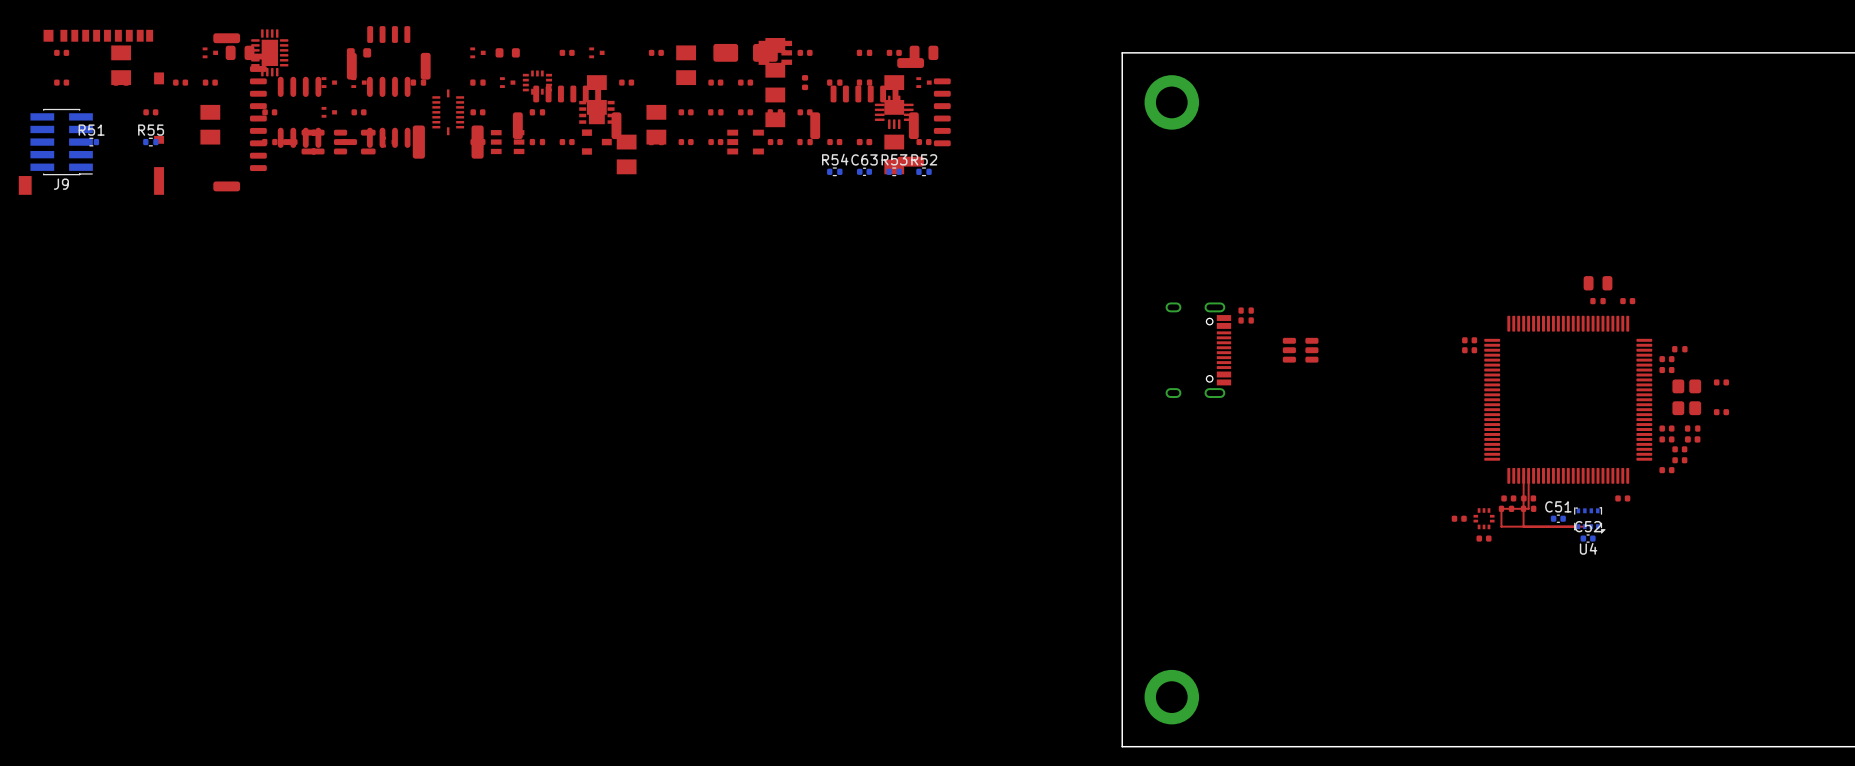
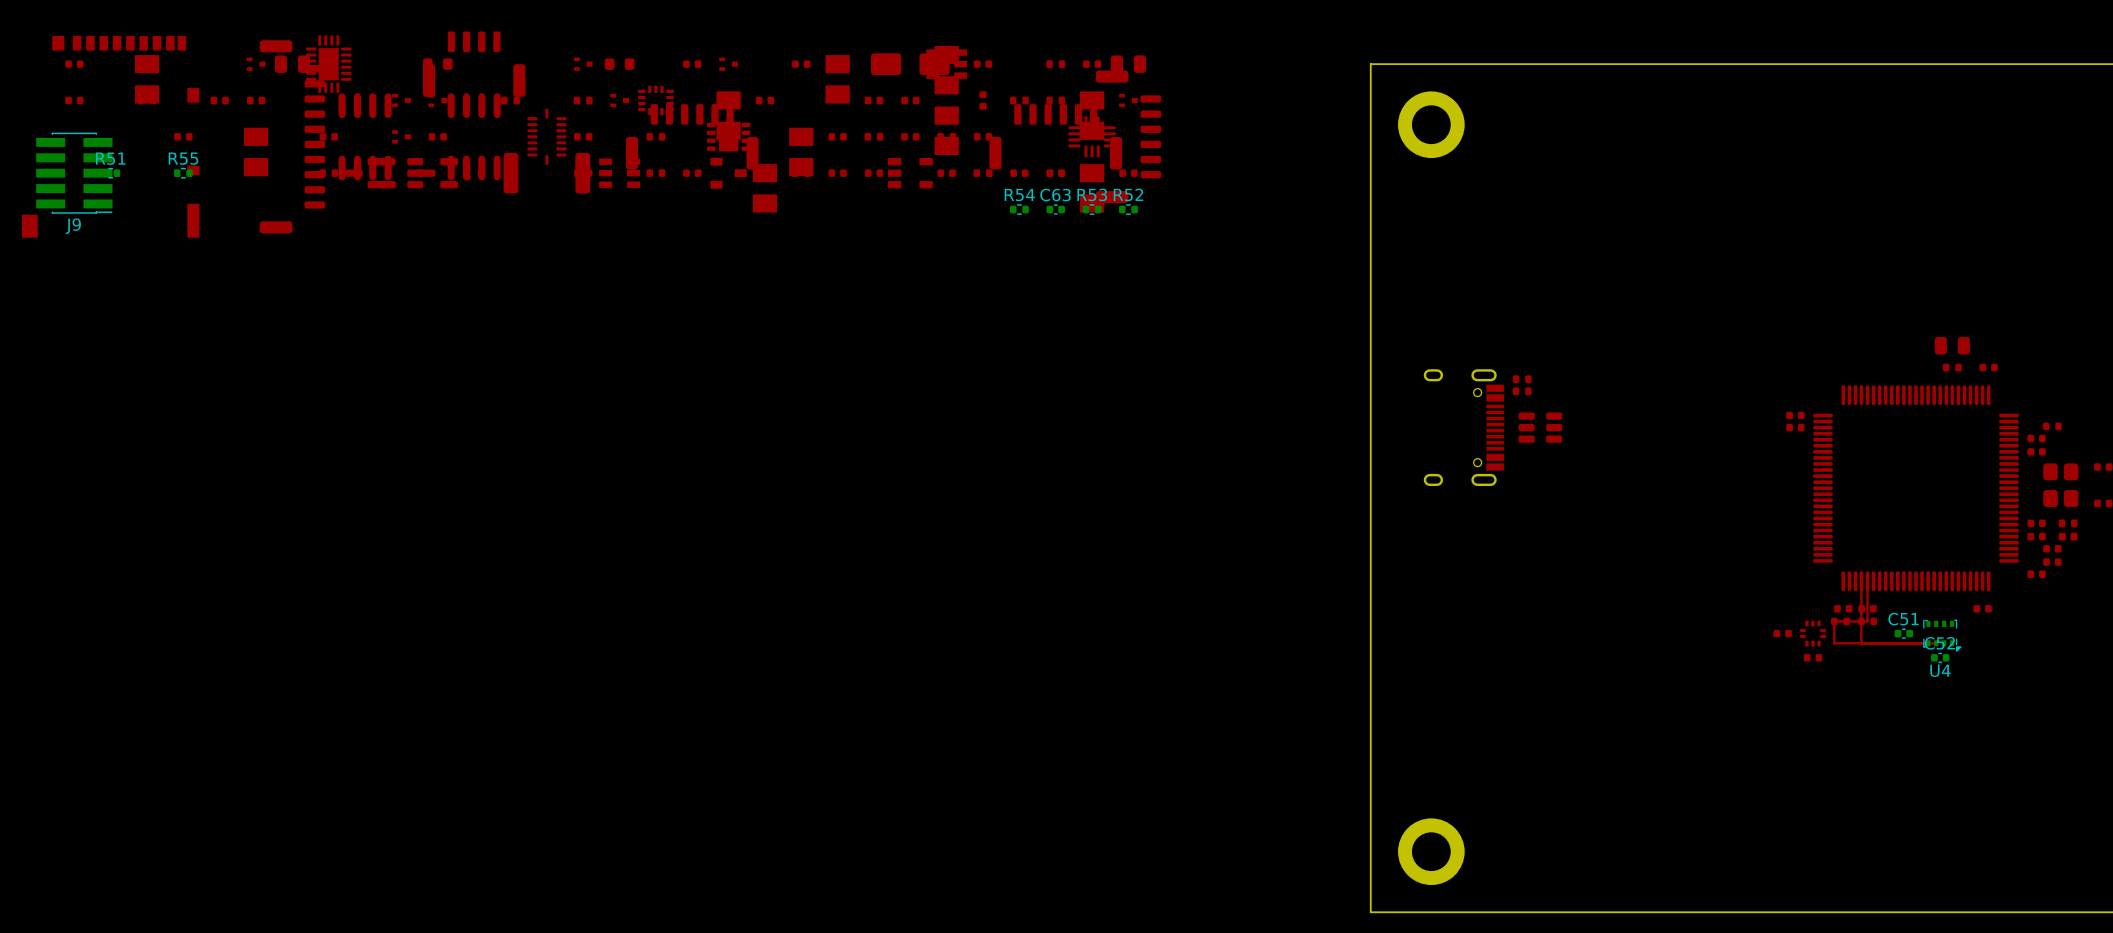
part position: (1300, 350) -> (1540, 427)

